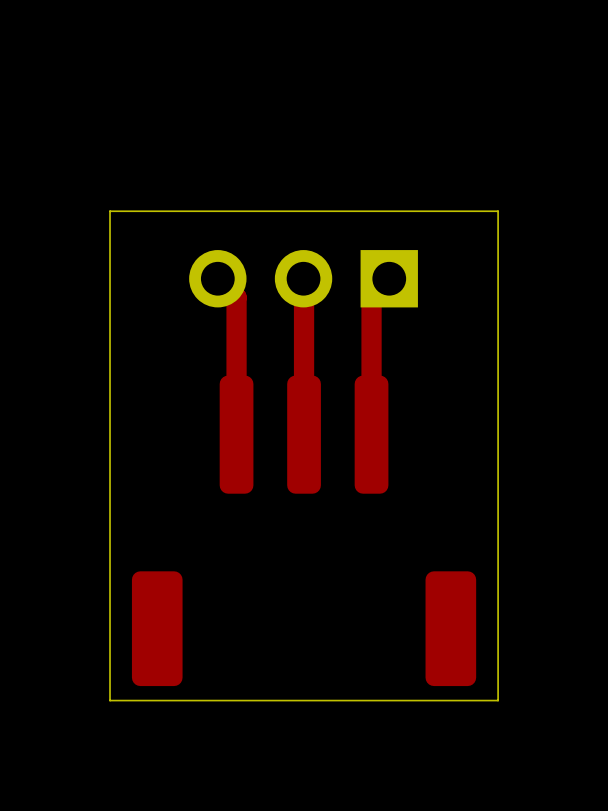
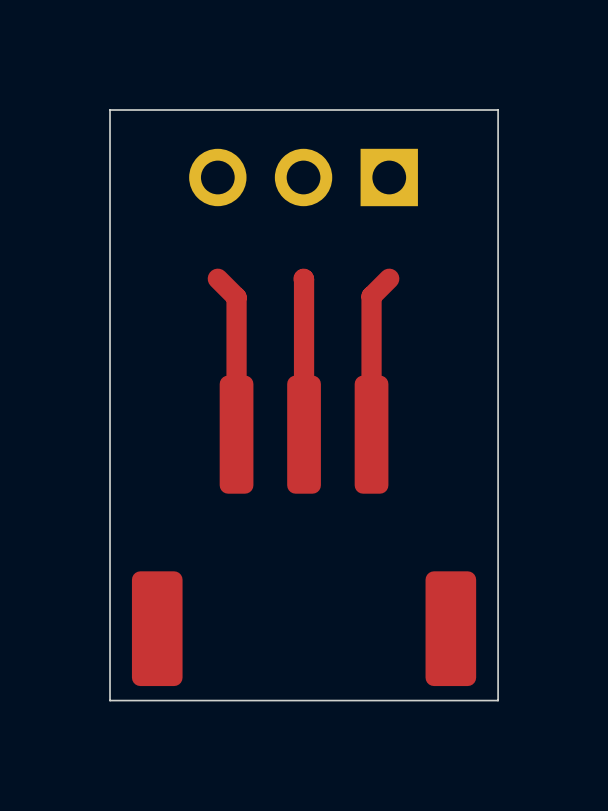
board edge: (498, 211) (110, 211) -> (498, 211) (498, 110) (110, 110) (110, 211)
part position: (303, 278) -> (303, 177)

